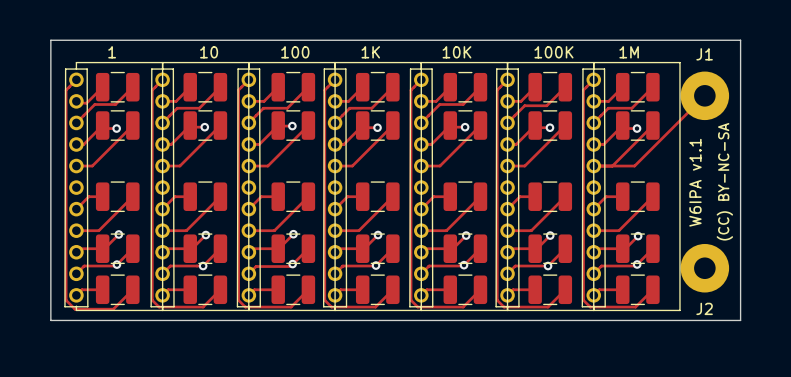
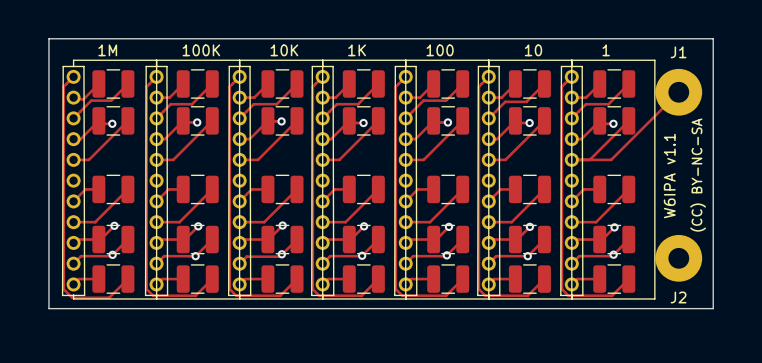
text: 1 (112, 52) -> 1M (107, 50)
text: 10 (209, 52) -> 100K (201, 50)
text: 100 (295, 52) -> 10K (284, 50)
text: 10K (456, 52) -> 100 (440, 50)
text: 100K (553, 52) -> 10 (533, 50)
text: 1M (629, 52) -> 1 (606, 50)

